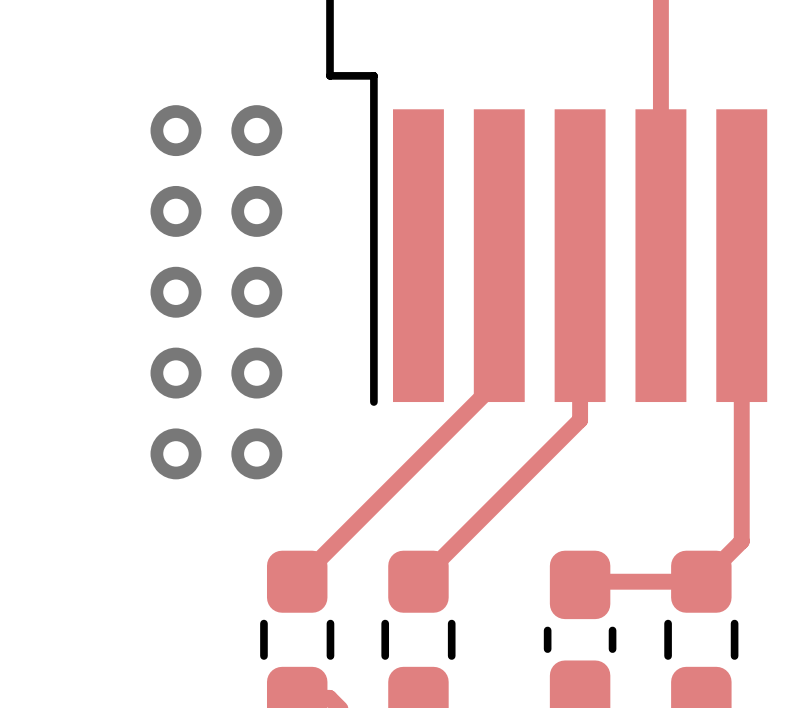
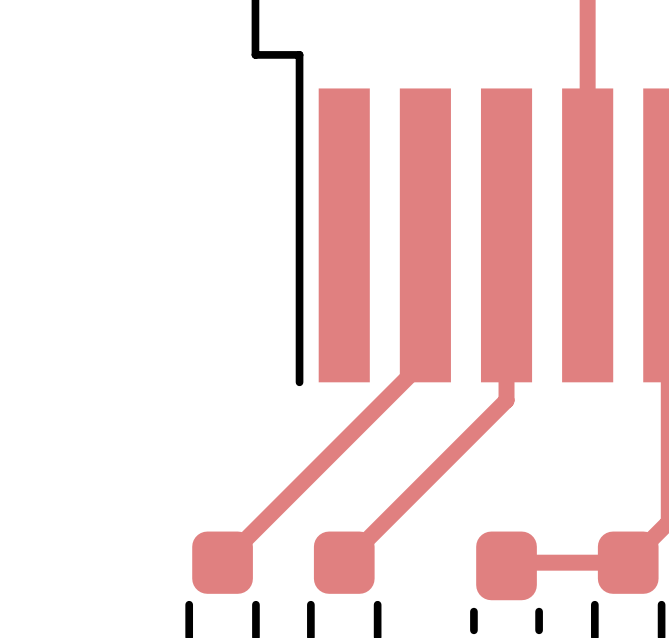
via: (175, 130) -> none
via: (256, 130) -> none
via: (175, 211) -> none
via: (256, 211) -> none
via: (175, 292) -> none
via: (256, 292) -> none
via: (175, 373) -> none
via: (256, 373) -> none
via: (175, 453) -> none
via: (256, 453) -> none

